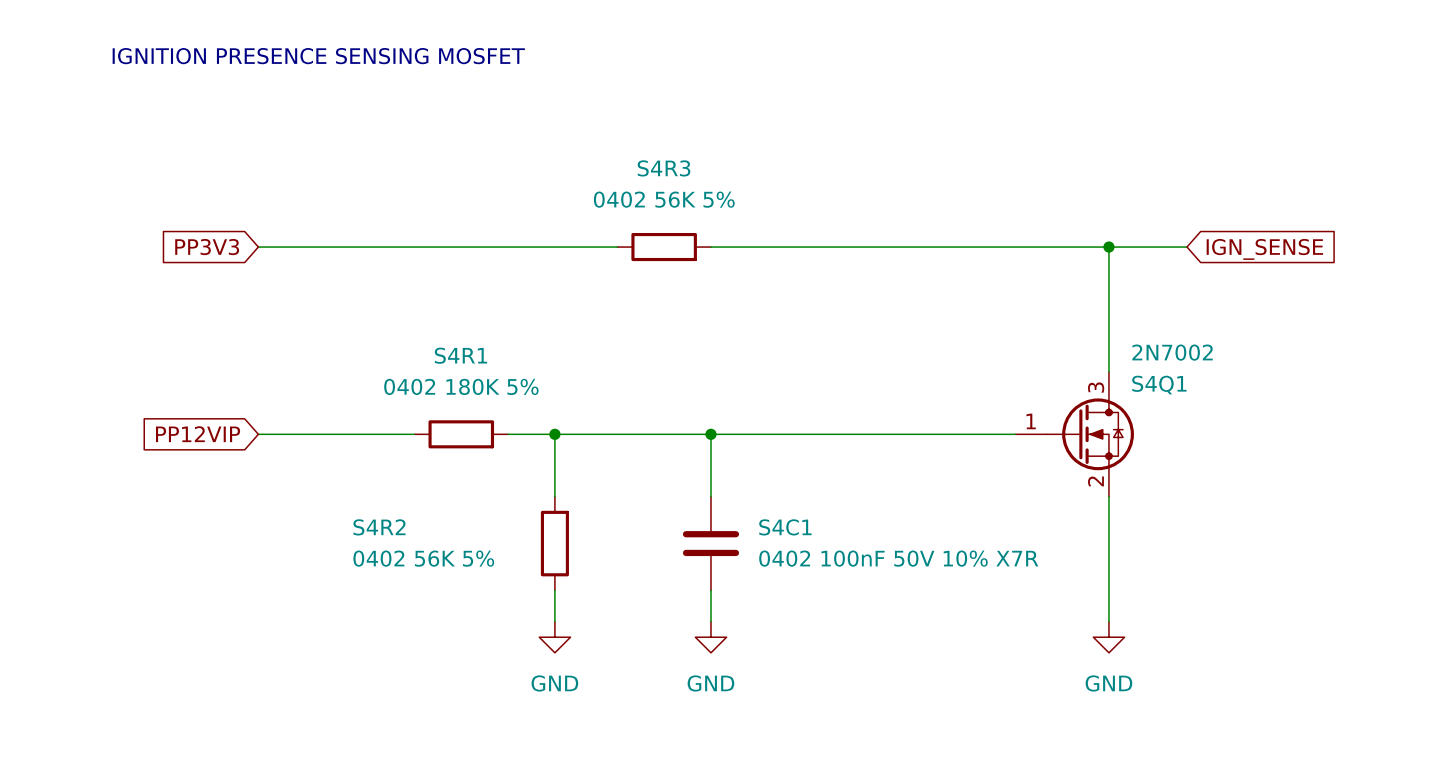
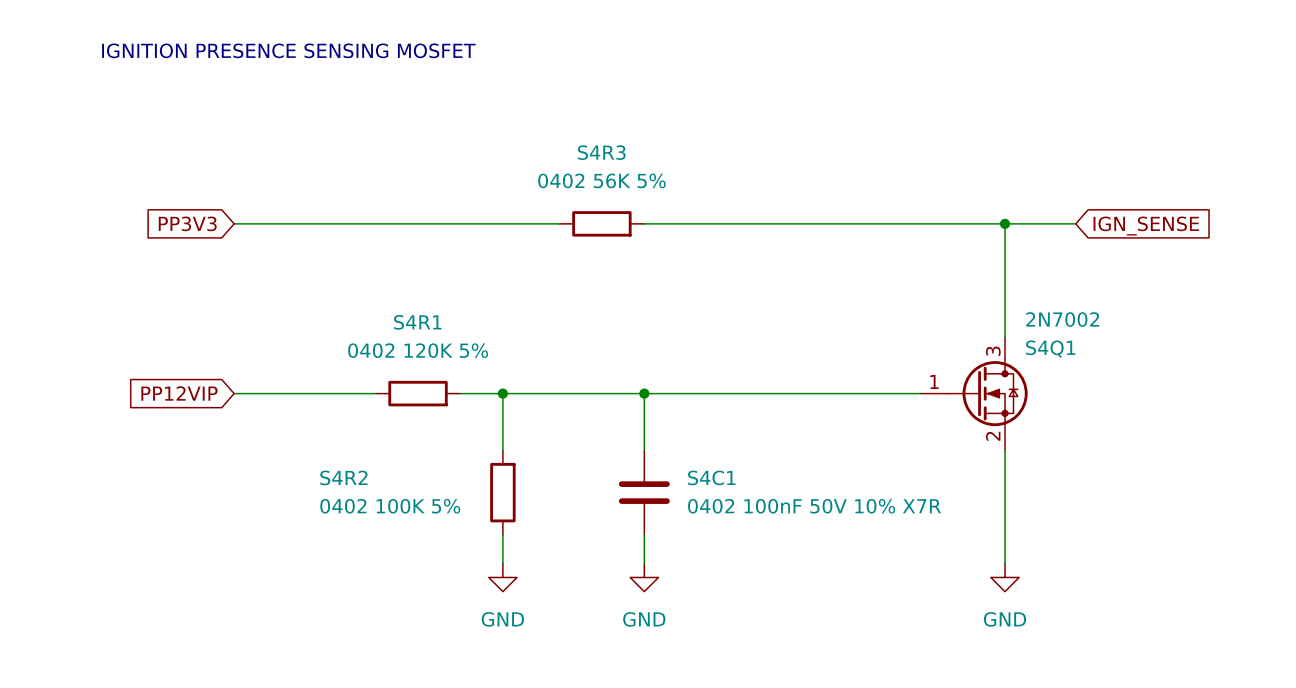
S4R1 value: 0402 180K 5% (461, 386) -> 0402 120K 5% (418, 350)
S4R2 value: 0402 56K 5% (423, 558) -> 0402 100K 5% (390, 506)

